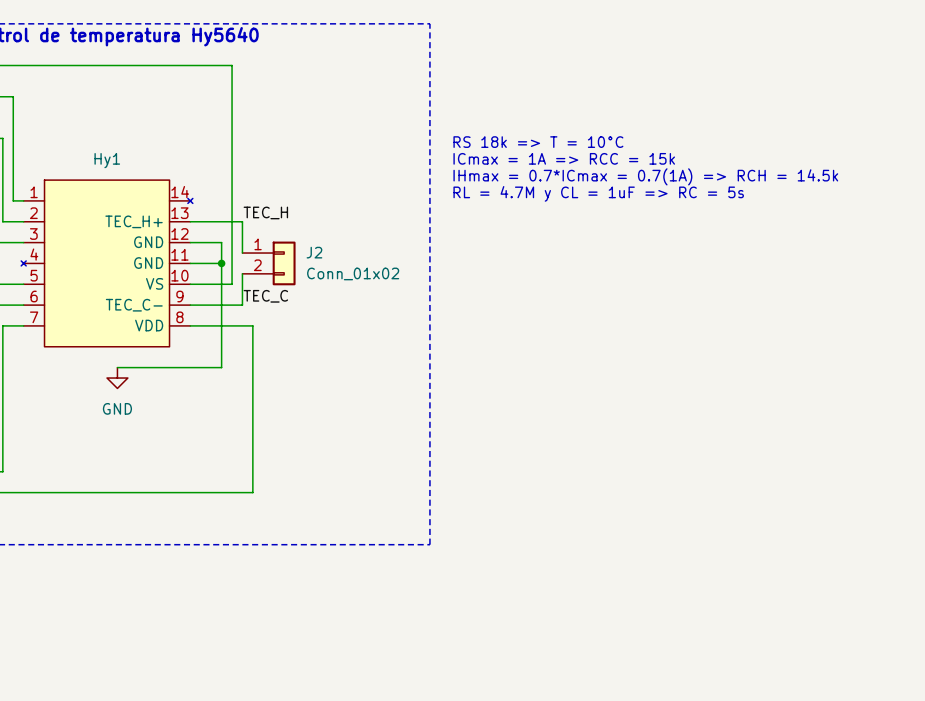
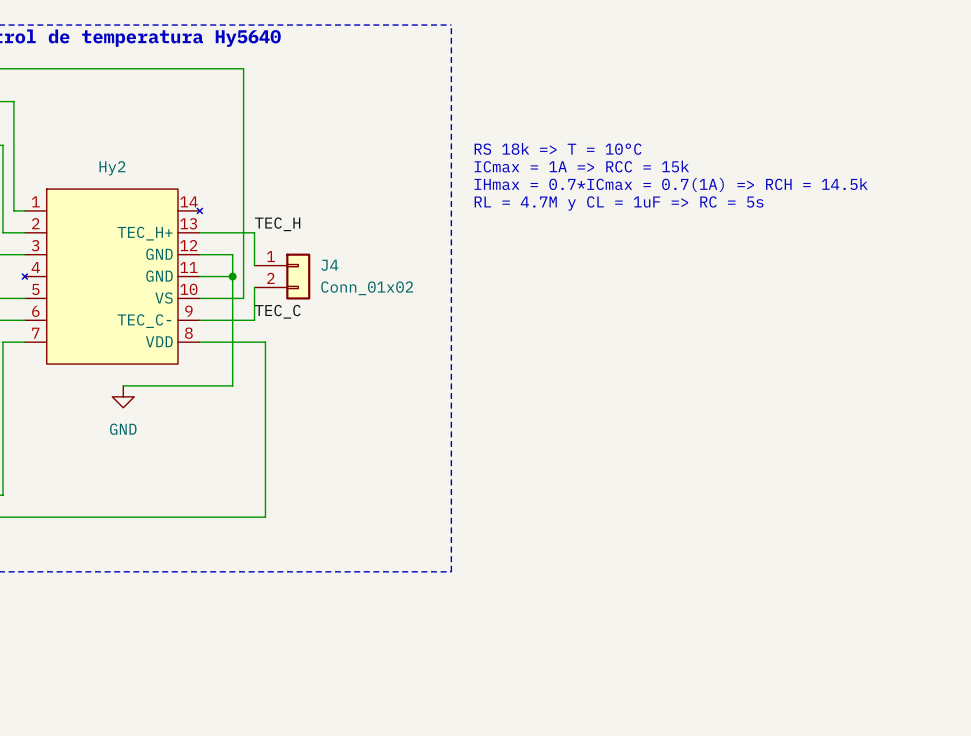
Hy1 name: Hy1 (107, 160) -> Hy2 (112, 168)
J2 name: J2 (314, 252) -> J4 (329, 265)

